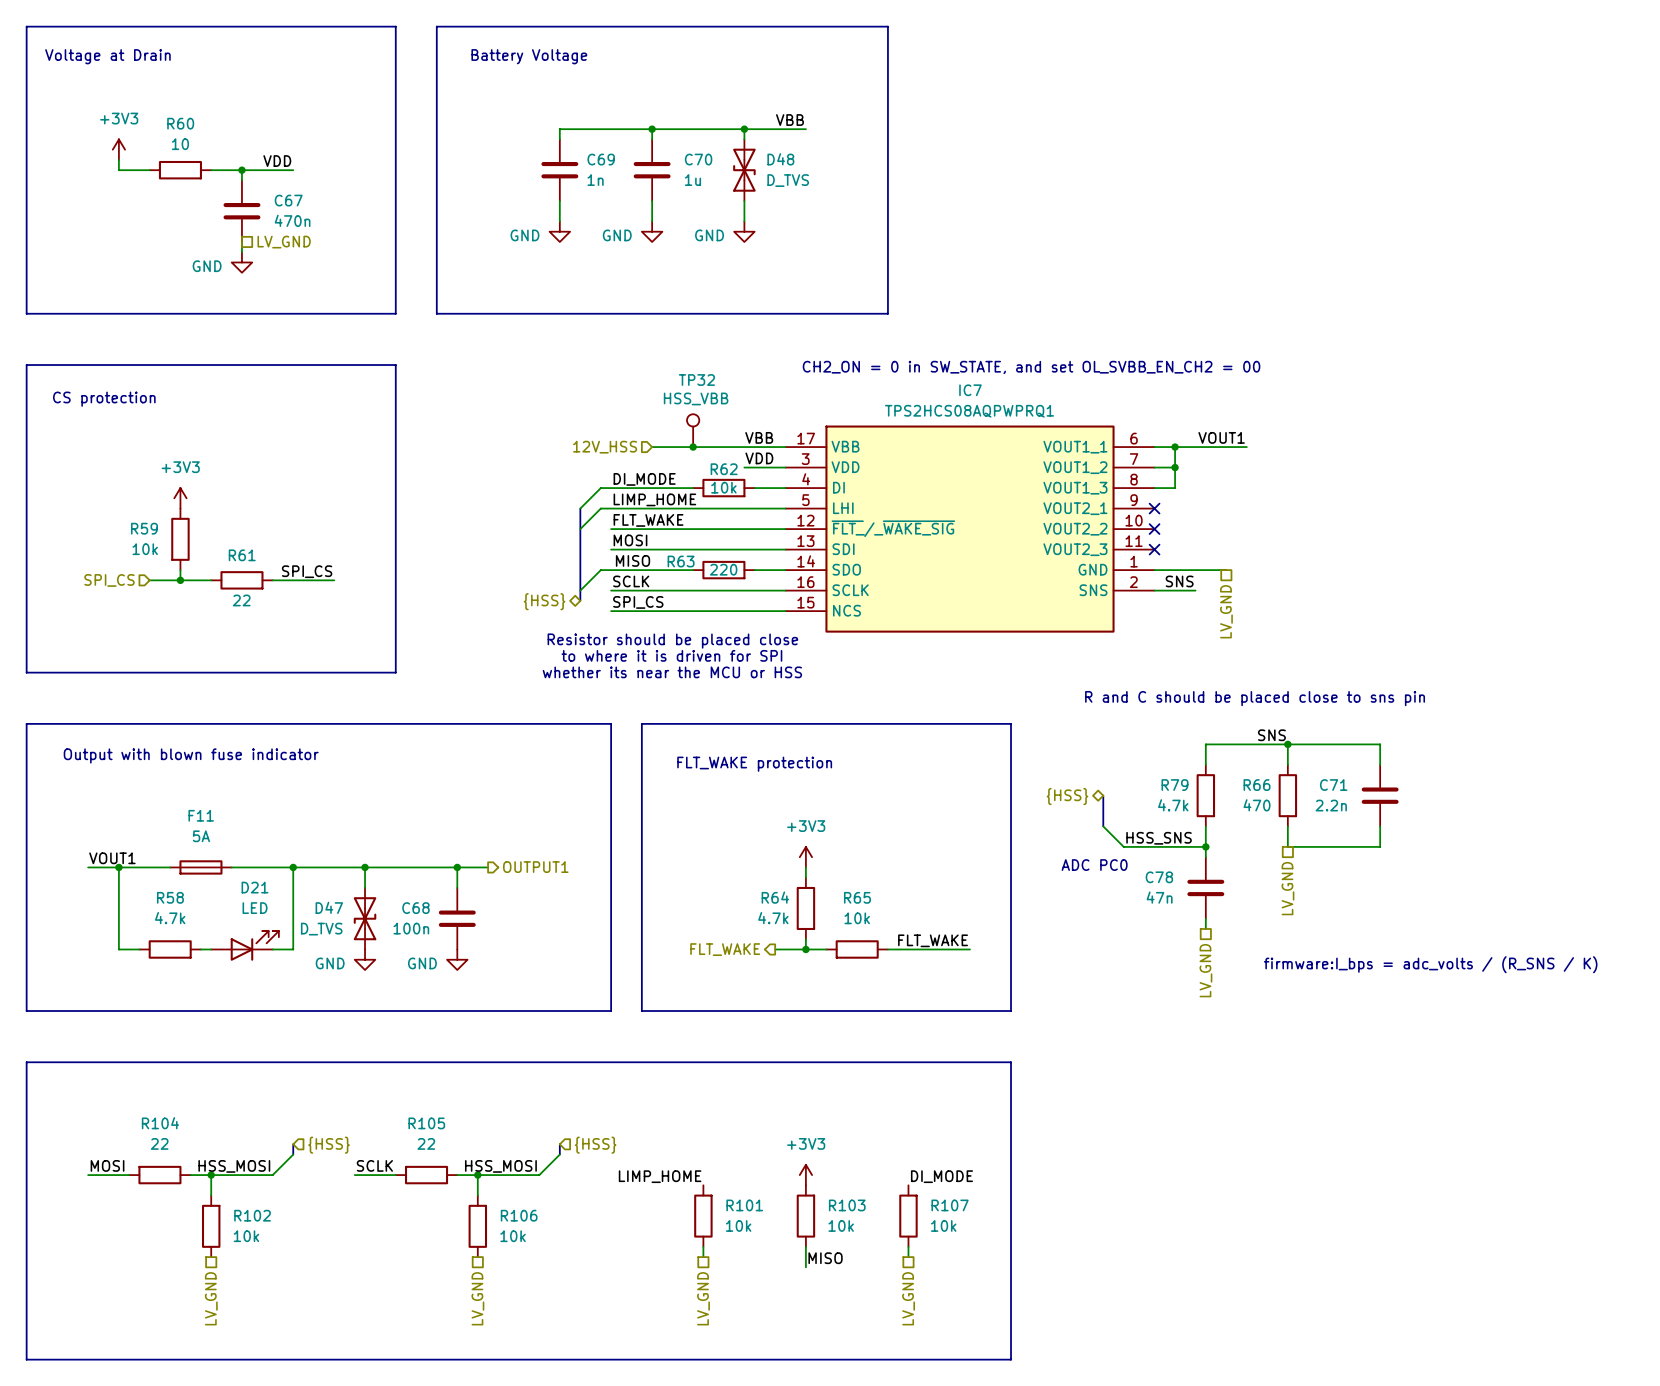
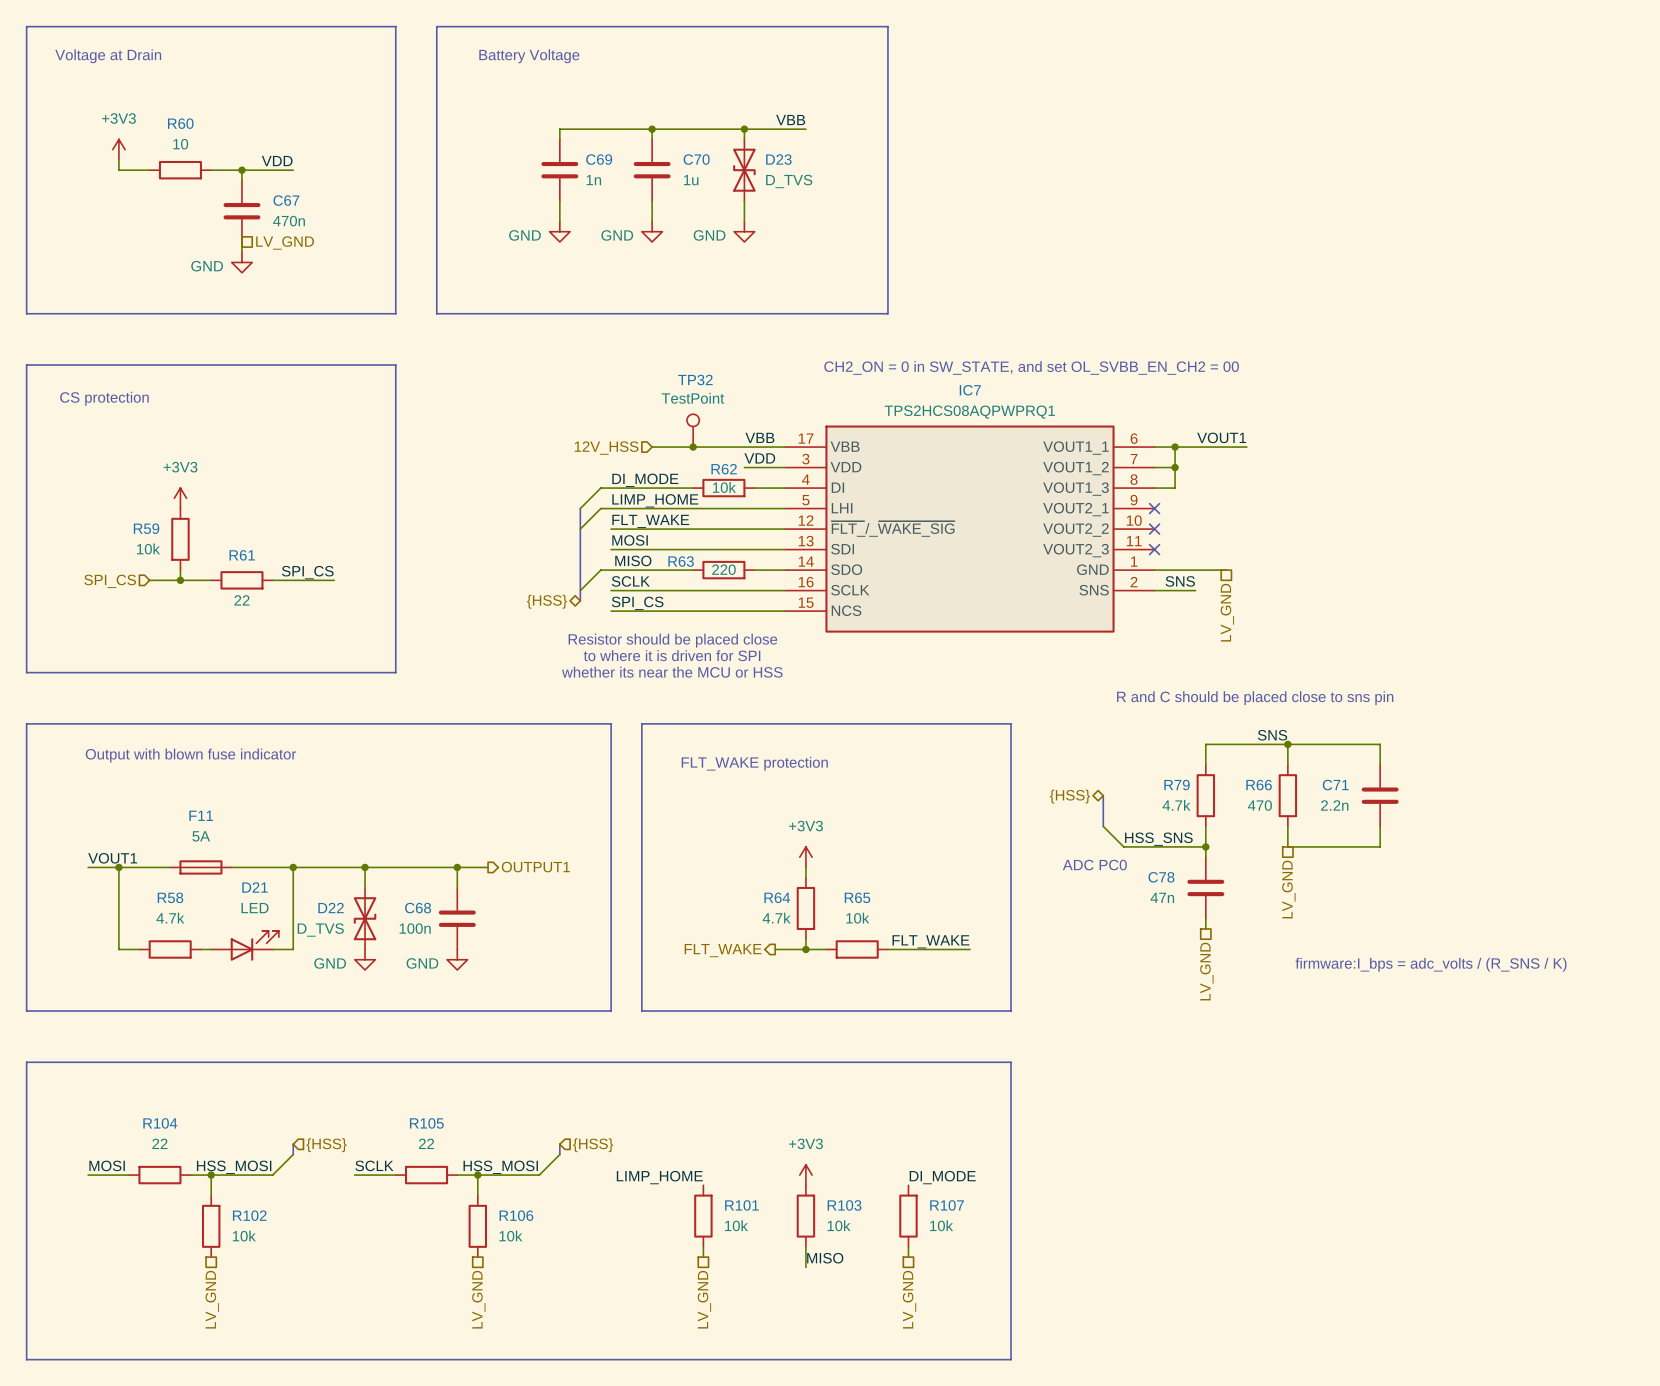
D48 name: D48 (780, 159) -> D23 (778, 159)
TP32 value: HSS_VBB (696, 398) -> TestPoint (692, 398)
D47 name: D47 (329, 907) -> D22 (331, 908)

